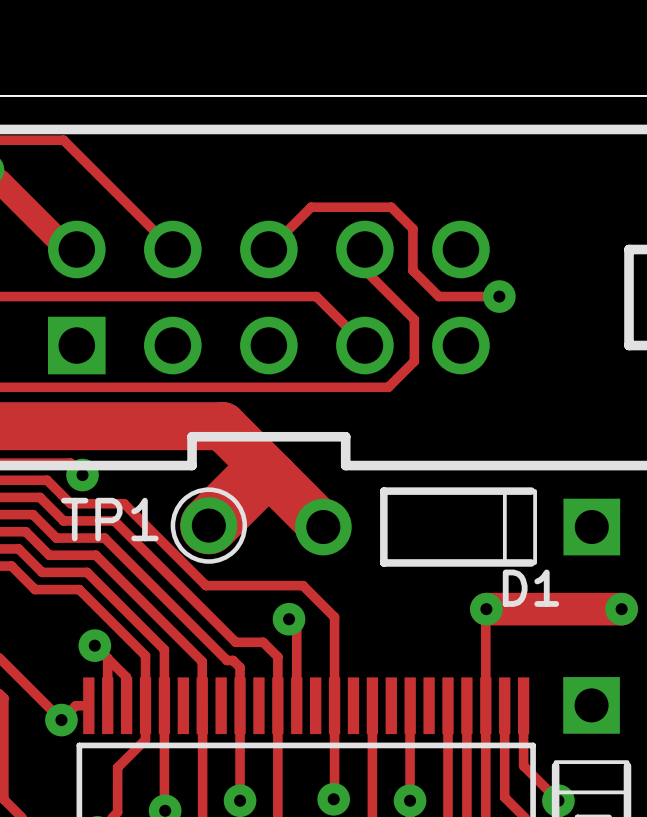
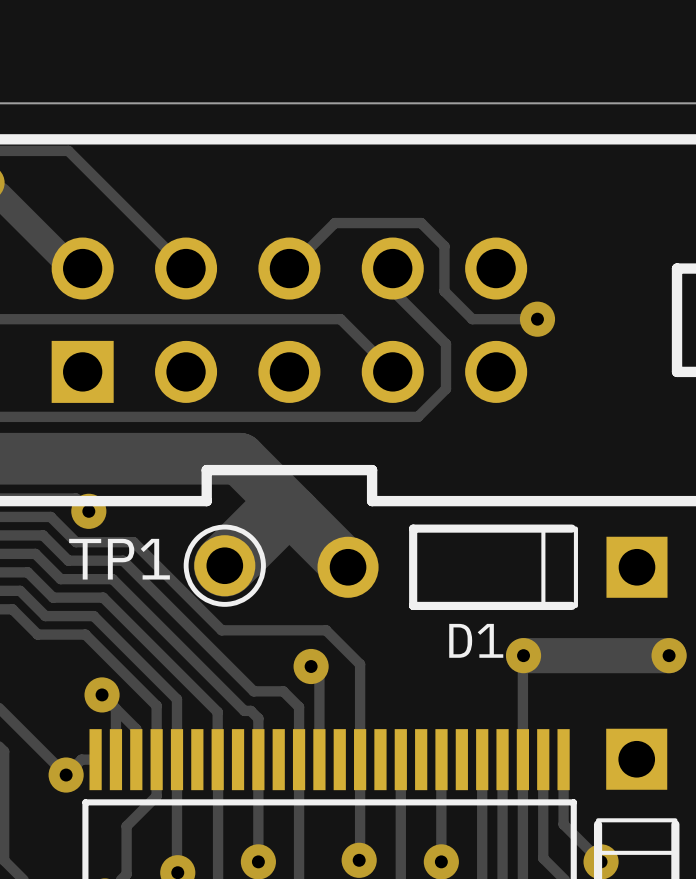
text position: D1 (530, 588) -> D1 (476, 640)

